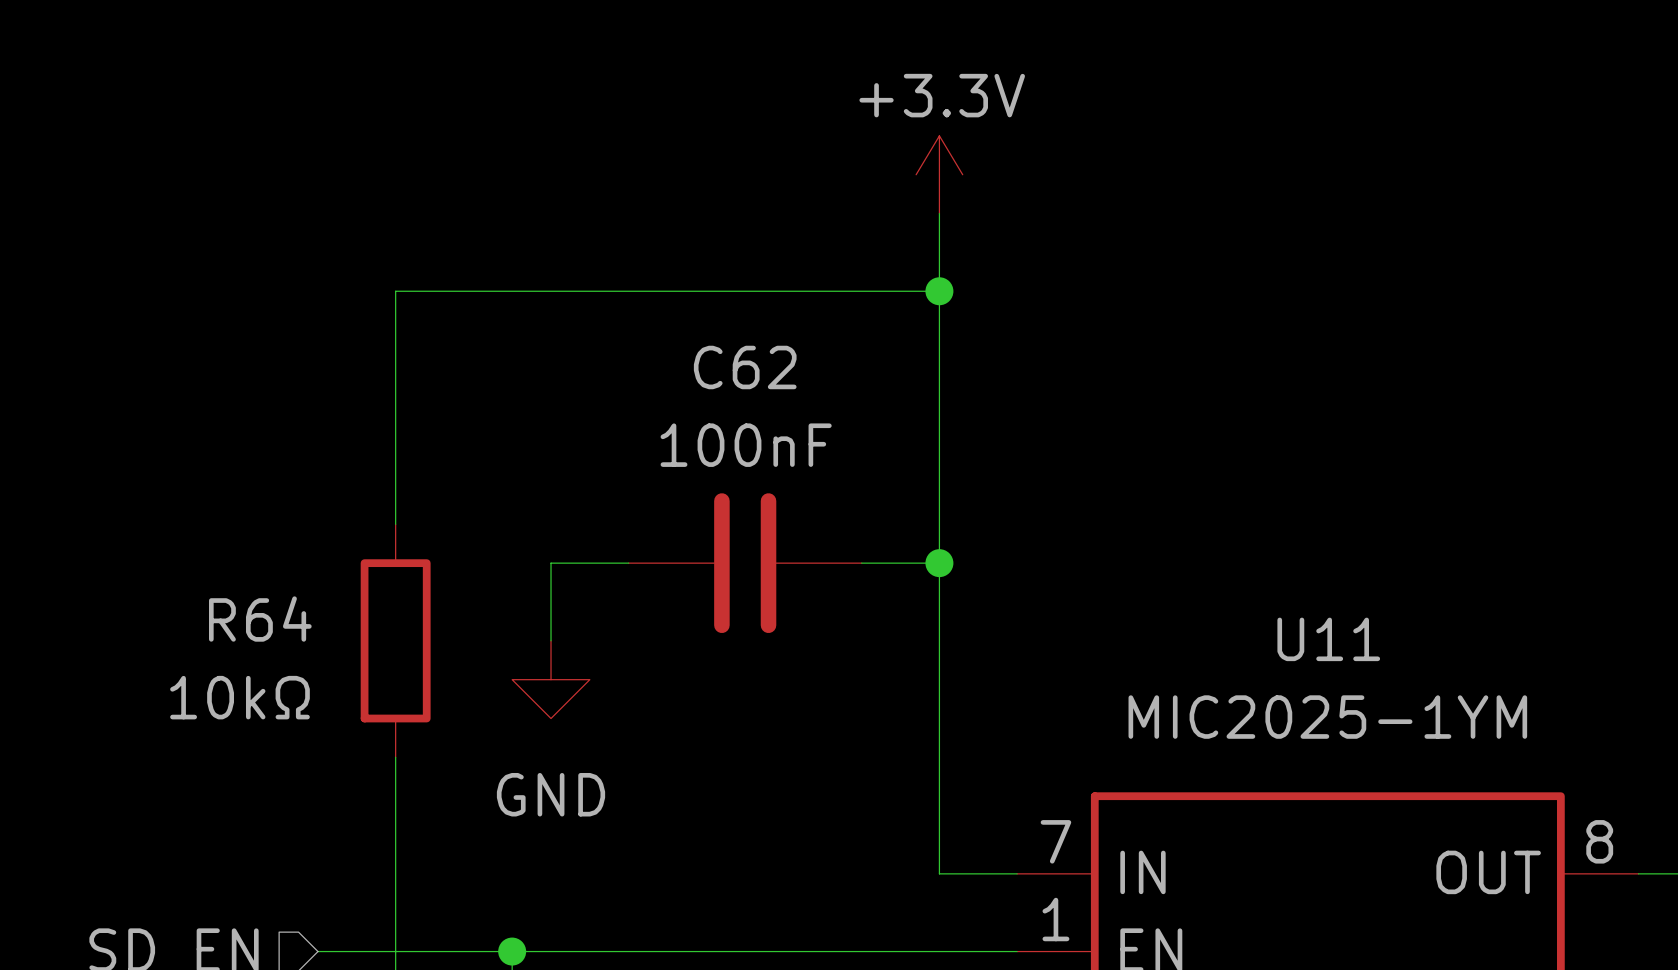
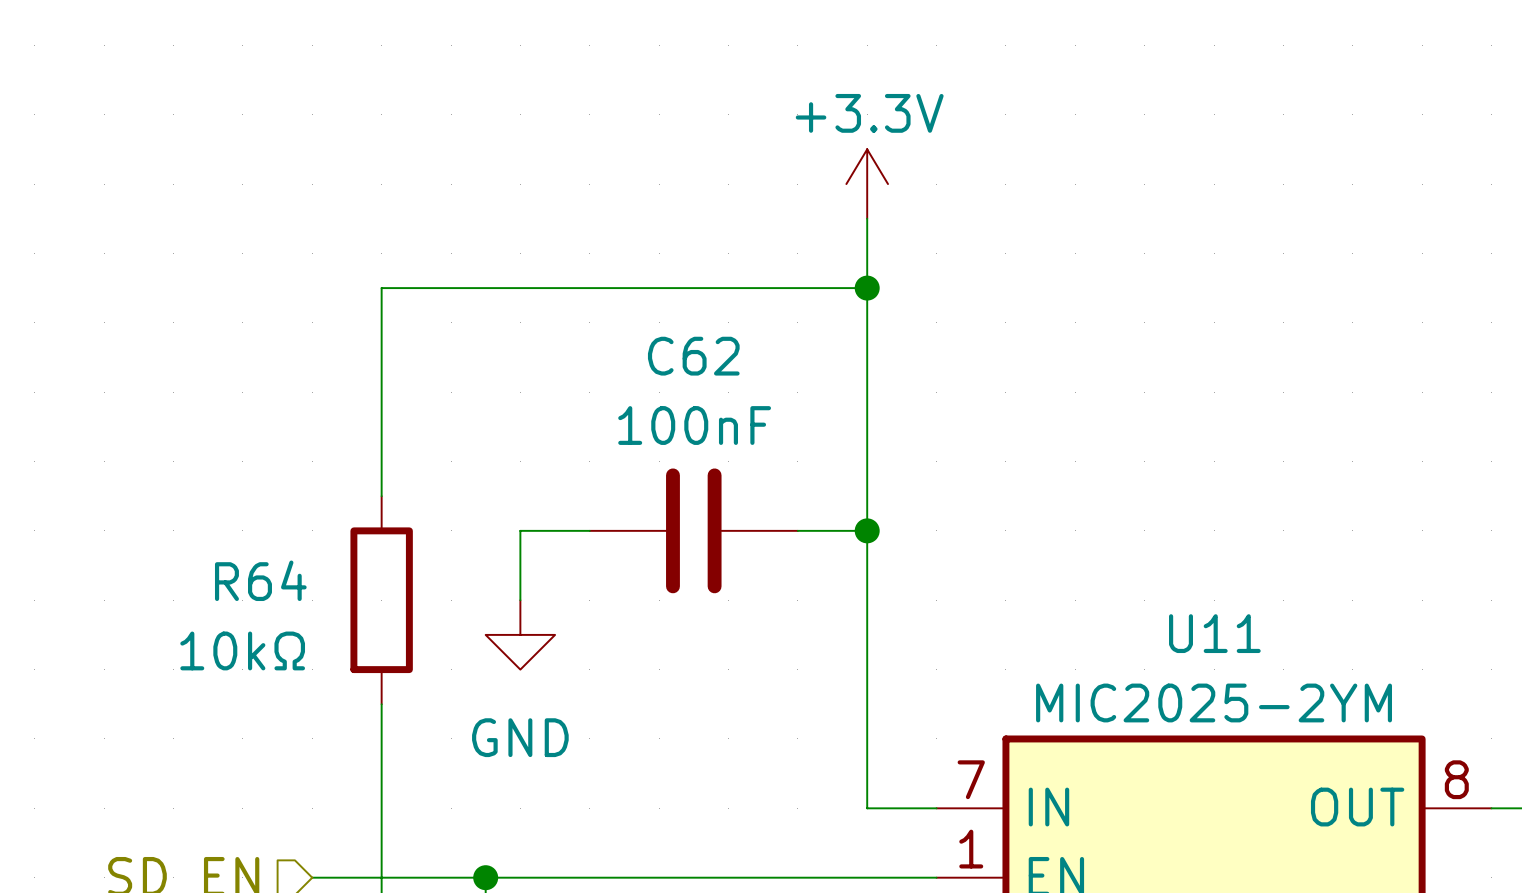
U11 name position: U11 (1328, 639) -> U11 (1214, 633)
U11 value: MIC2025-1YM (1327, 717) -> MIC2025-2YM (1214, 702)

